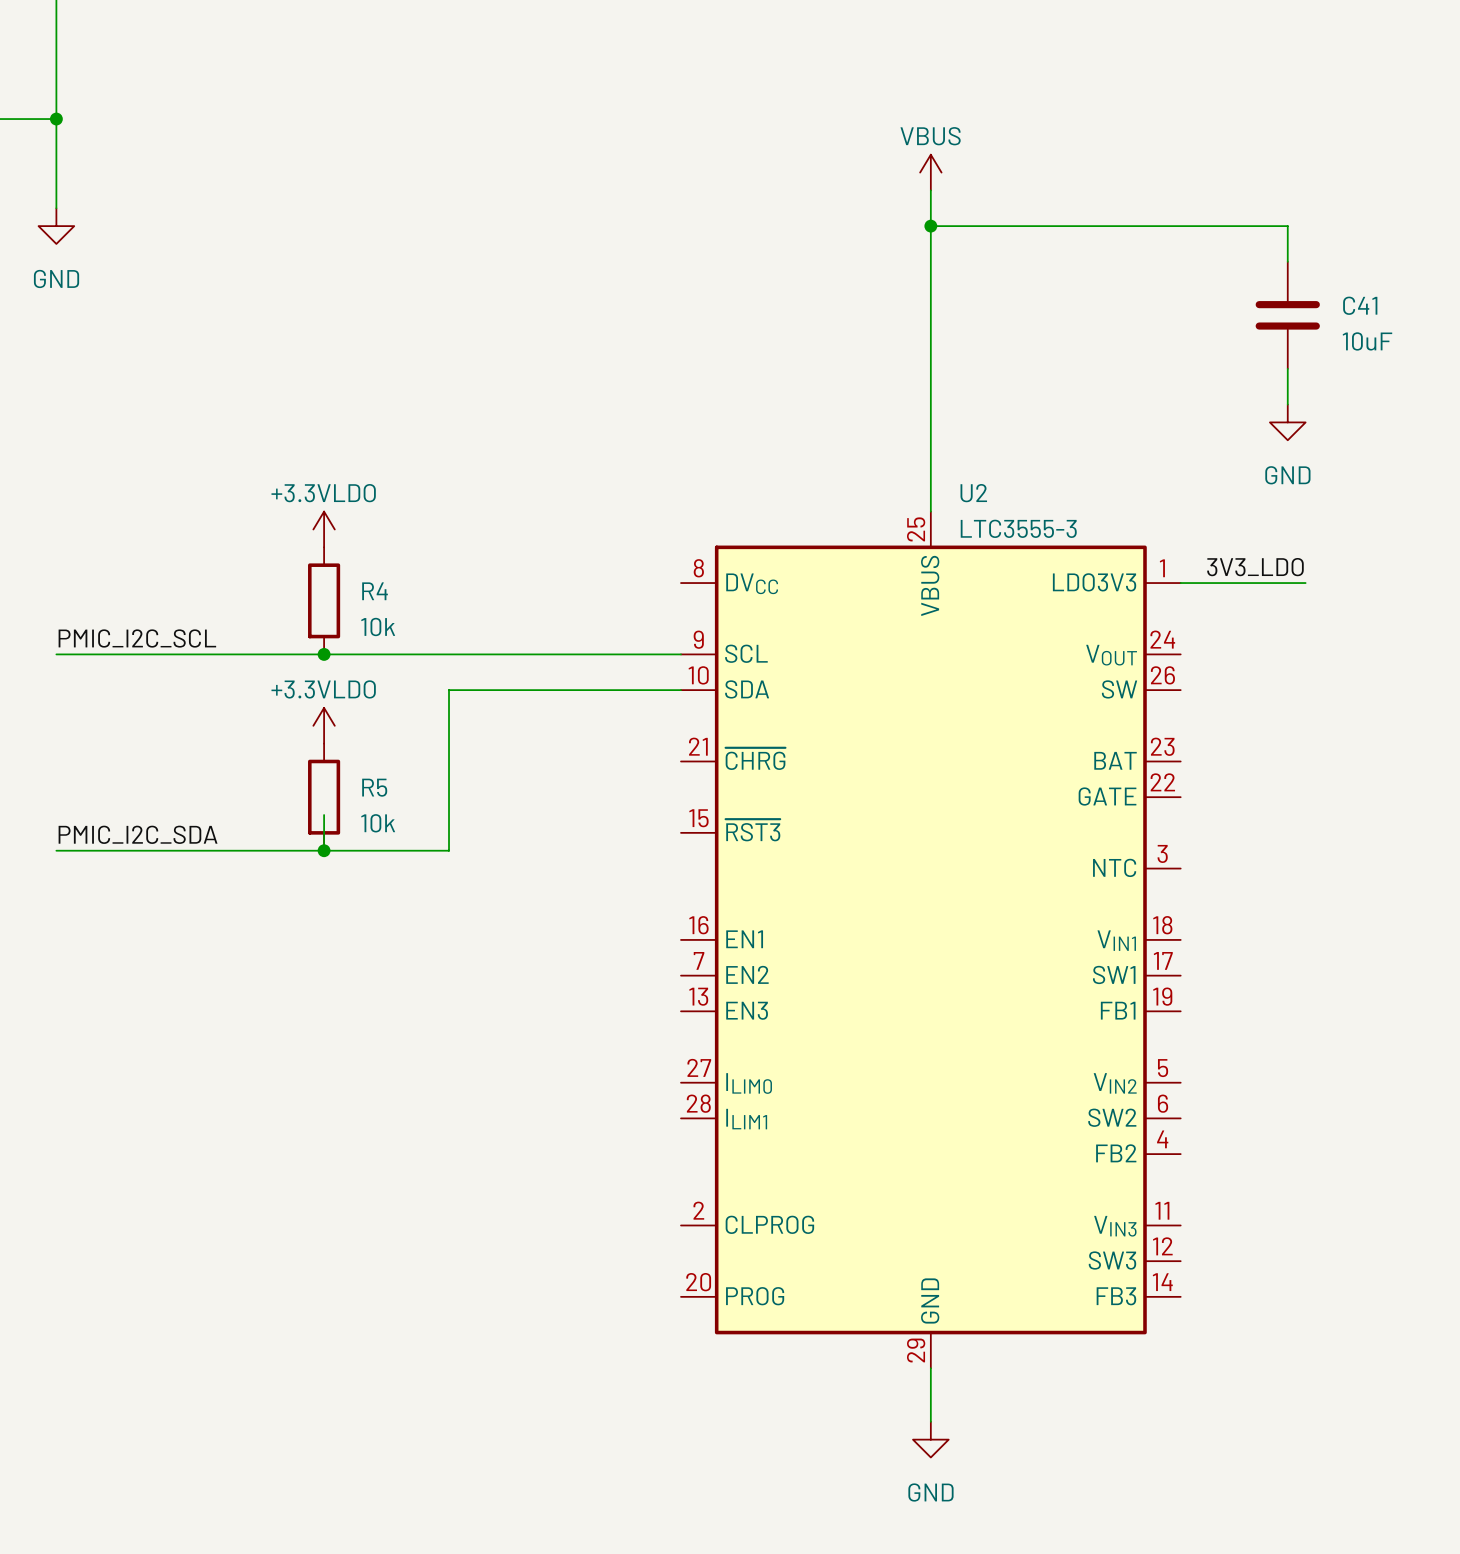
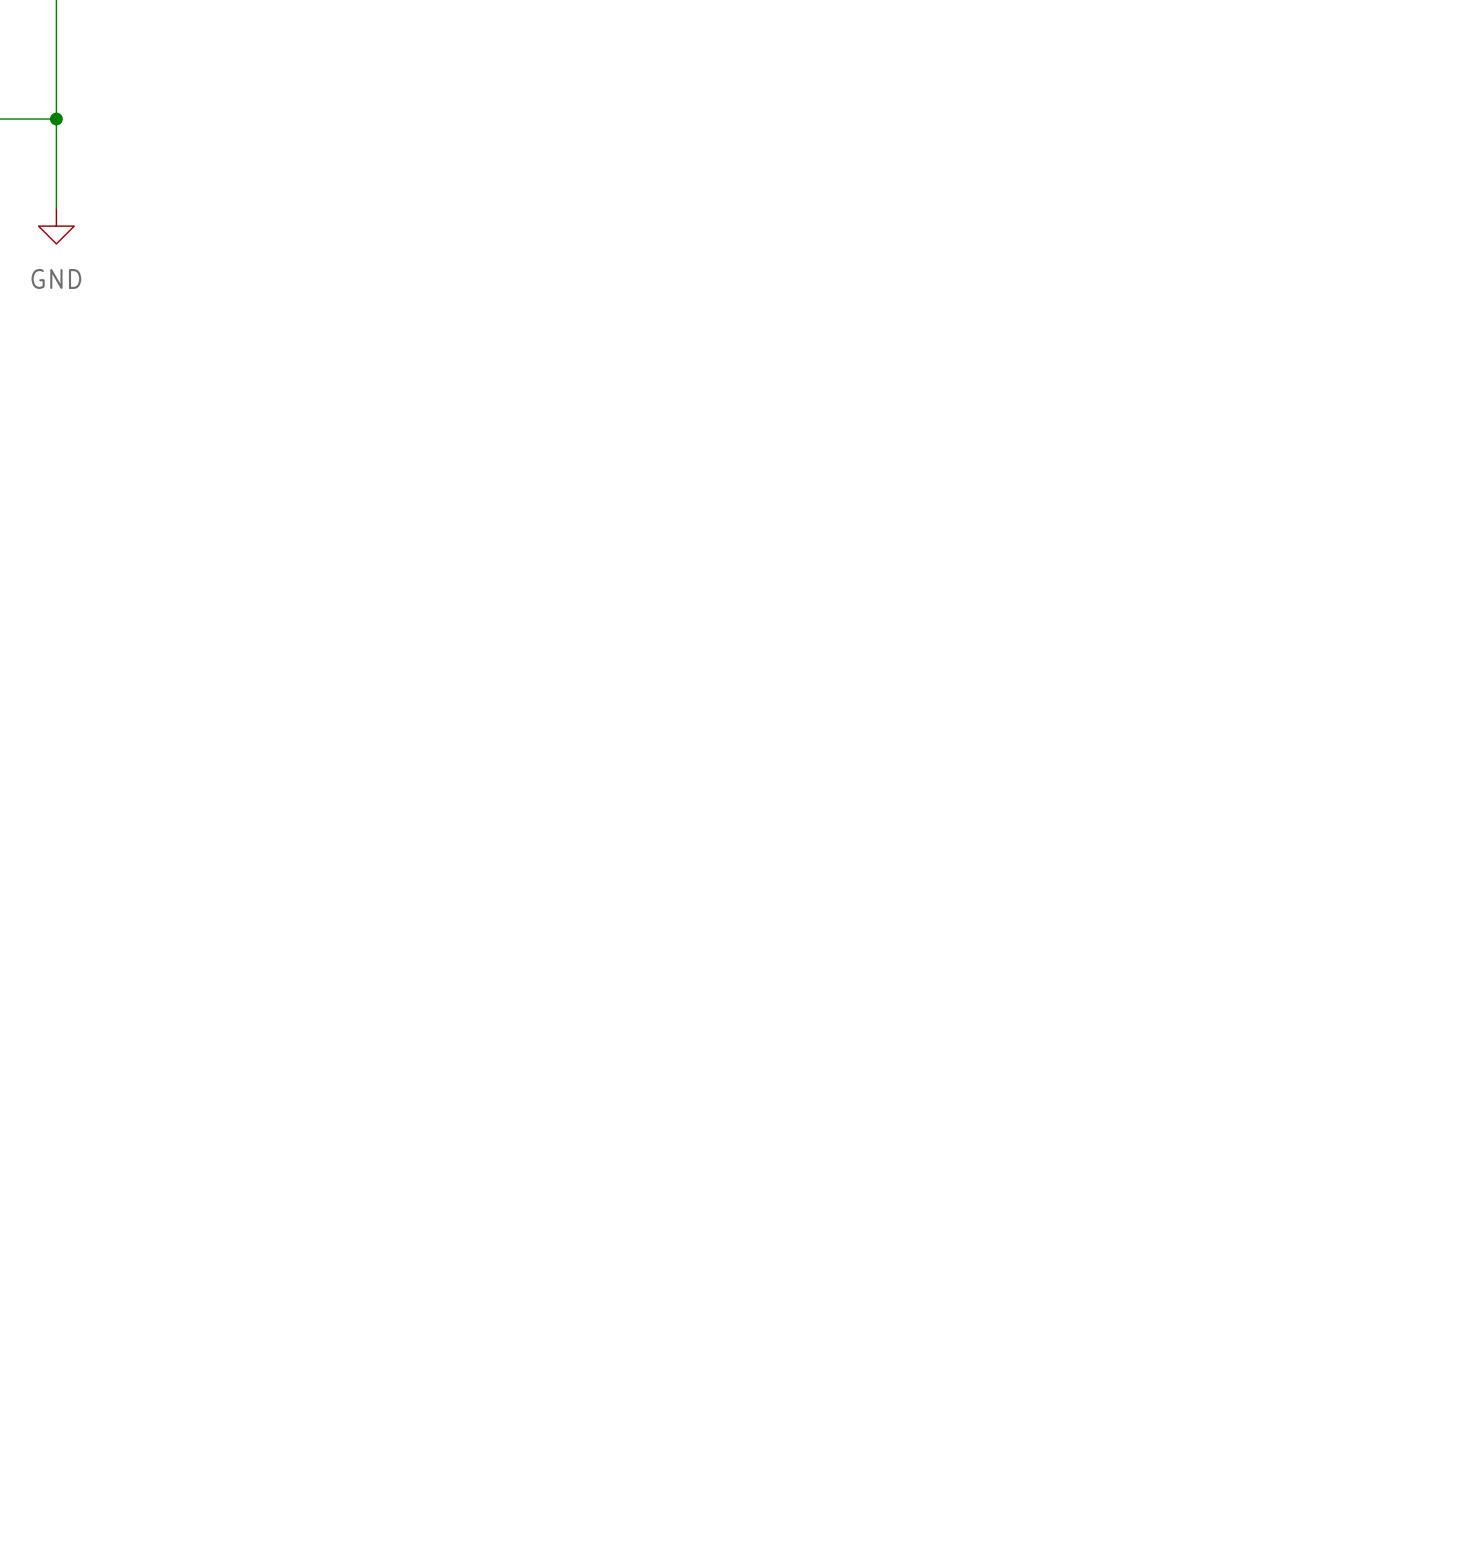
power symbol: VBUS (930, 172) -> none
wire: (930, 190) (930, 511) -> none
wire: (930, 226) (1287, 226) (1287, 261) -> none
junction: (930, 226) -> none
C41: 10uF (1287, 315) -> none
wire: (1287, 368) (1287, 404) -> none
power symbol: GND (1287, 422) -> none
power symbol: +3.3VLDO (324, 529) -> none
label: 3V3_LDO (1255, 567) -> none
wire: (1180, 583) (1305, 583) -> none
R4: 10k (324, 600) -> none
label: PMIC_I2C_SCL (137, 638) -> none
wire: (56, 654) (681, 654) -> none
junction: (324, 654) -> none
wire: (681, 690) (449, 690) (449, 850) (56, 850) -> none
power symbol: +3.3VLDO (324, 725) -> none
R5: 10k (324, 797) -> none
wire: (324, 815) (324, 850) -> none
label: PMIC_I2C_SDA (138, 834) -> none
junction: (324, 850) -> none
U2: LTC3555-3 (930, 939) -> none
wire: (930, 1368) (930, 1421) -> none
power symbol: GND (930, 1439) -> none

